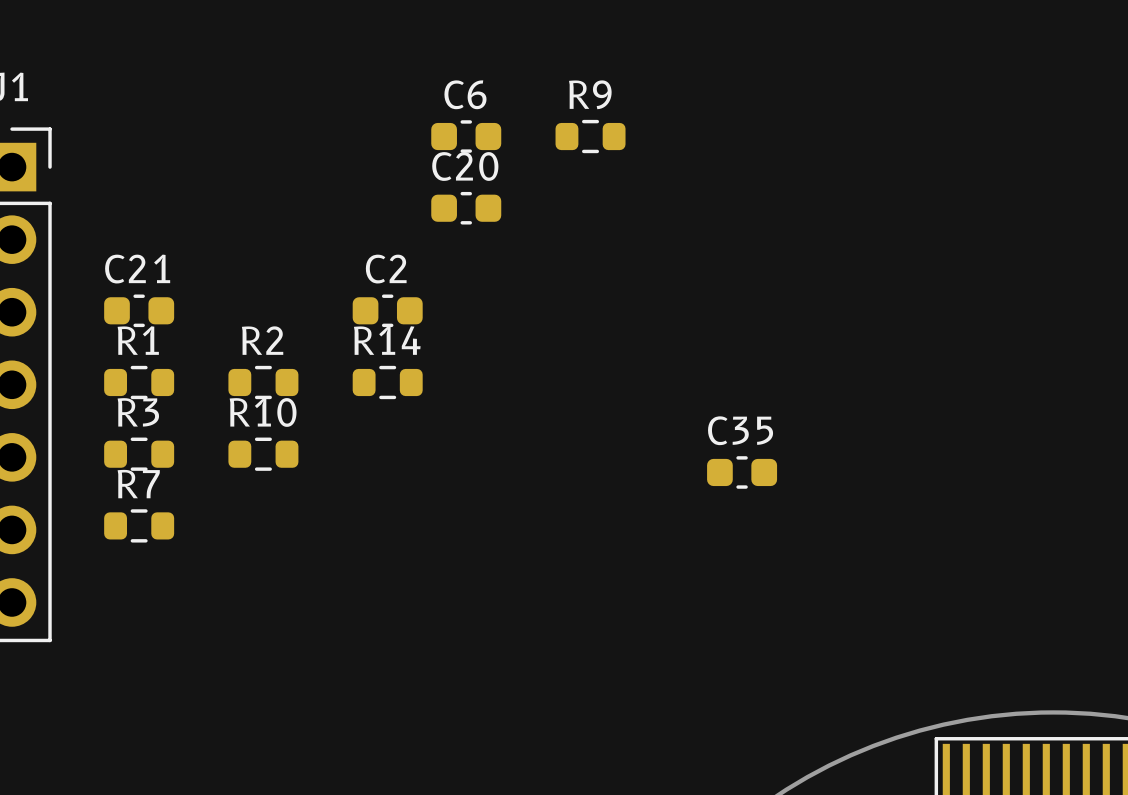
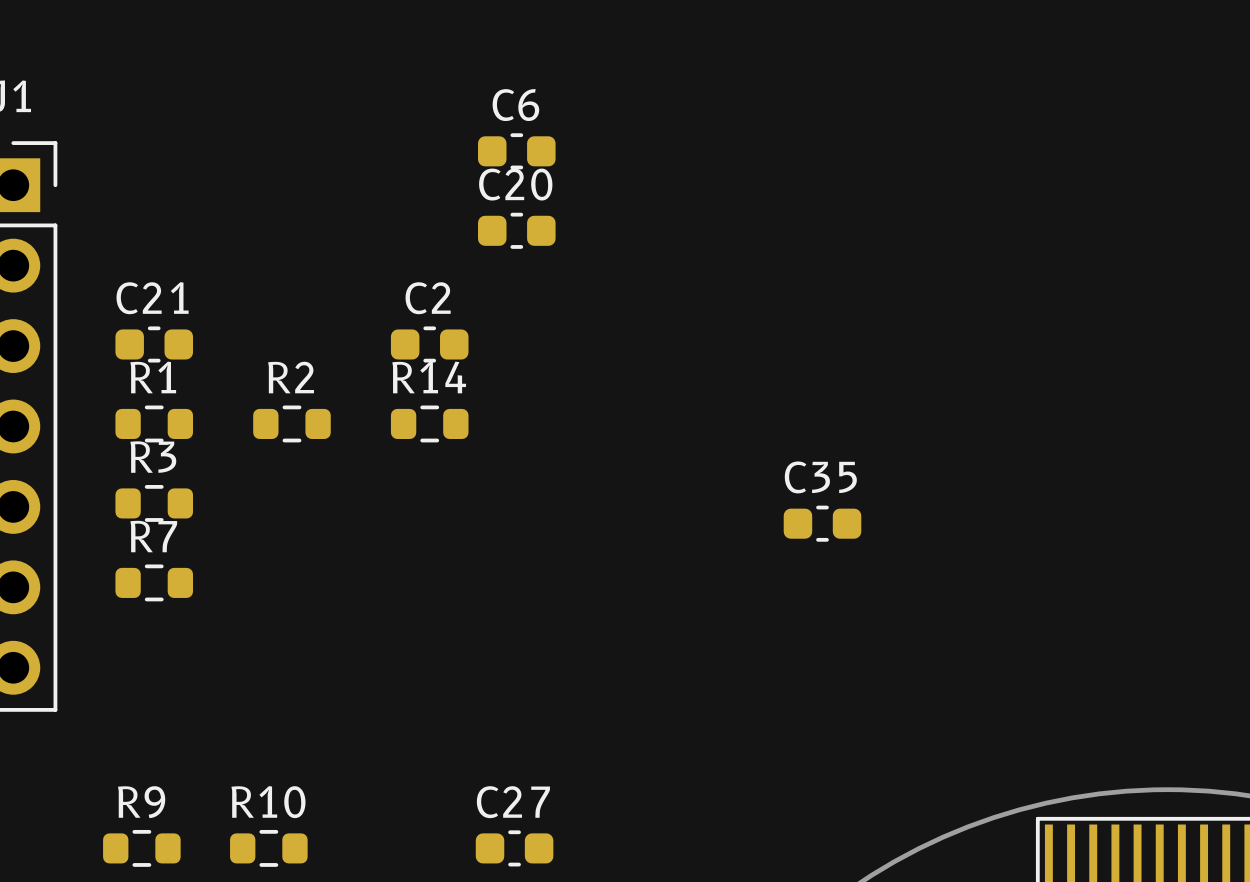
R9 position: (590, 136) -> (141, 848)
R10 position: (263, 454) -> (268, 848)
C27: none -> (514, 848)

